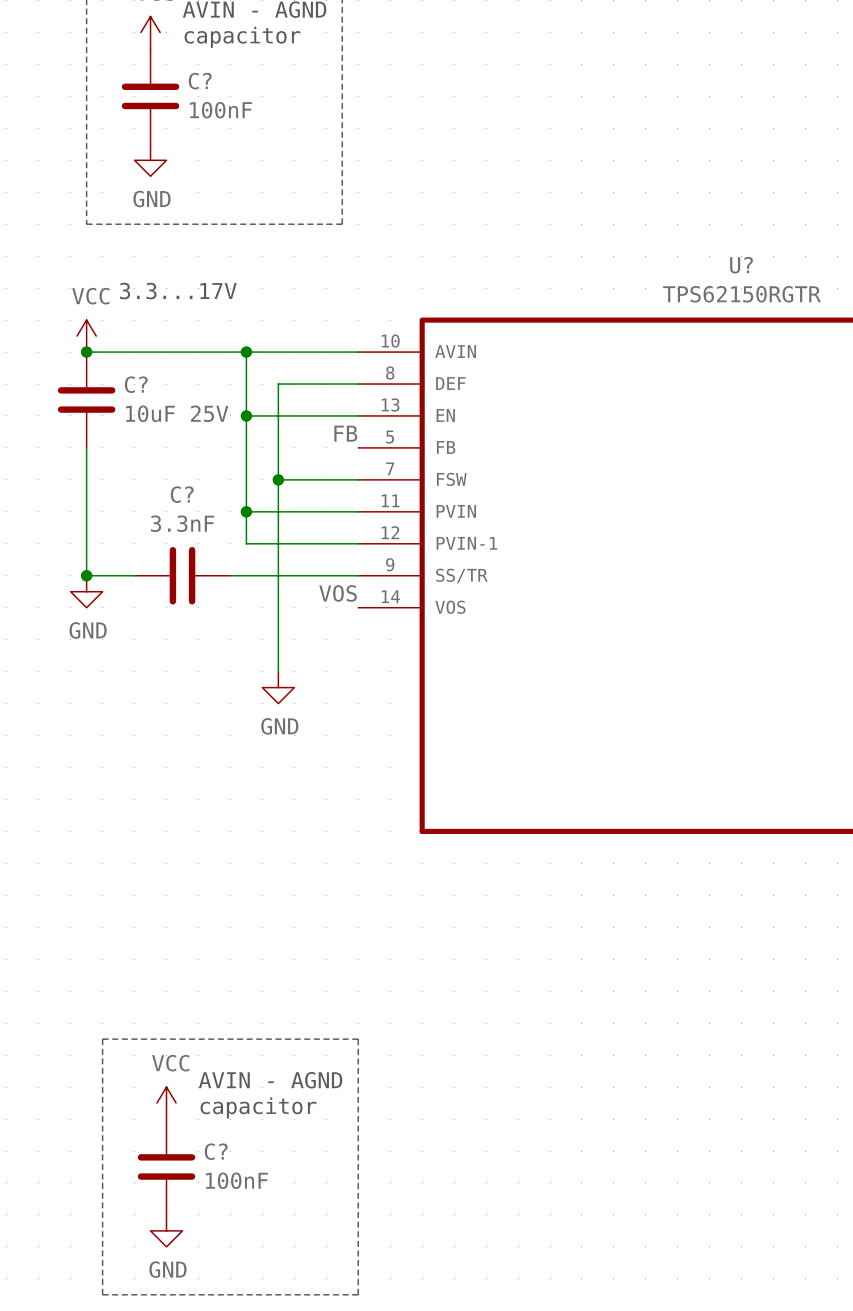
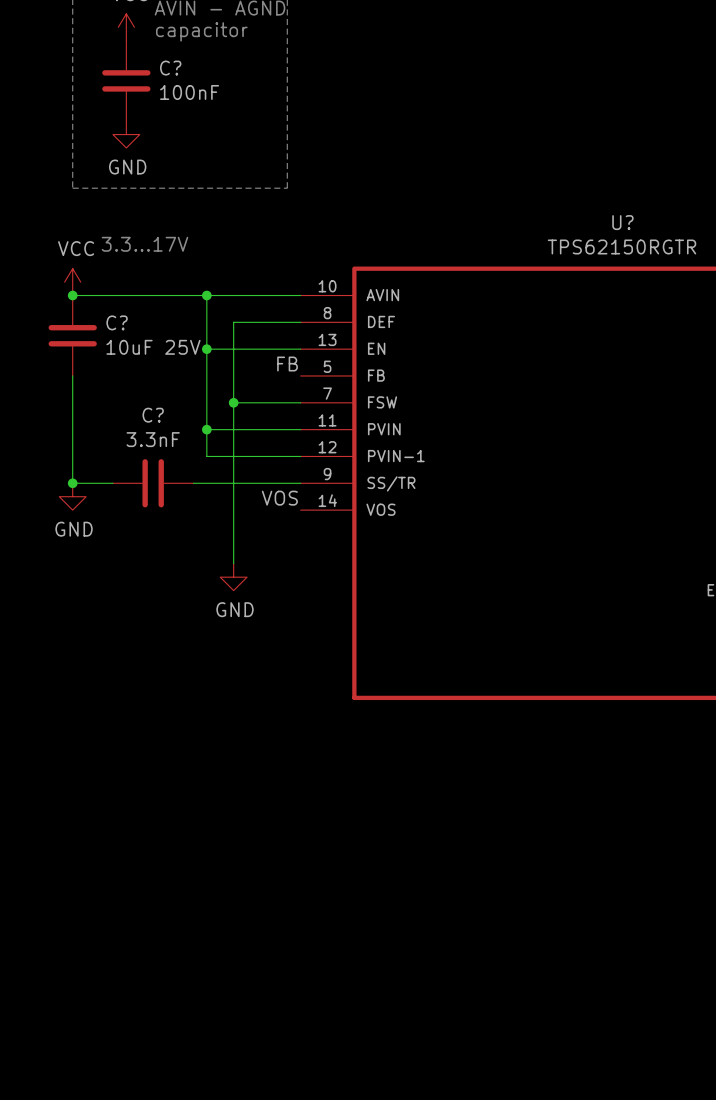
line: (102, 1039) (102, 1294) (358, 1294) (358, 1039) (102, 1039) -> none
text: AVIN - AGND (270, 1080) -> none
power symbol: VCC (166, 1103) -> none
text: capacitor (258, 1107) -> none
C?: 100nF (166, 1166) -> none
power symbol: GND (166, 1230) -> none

